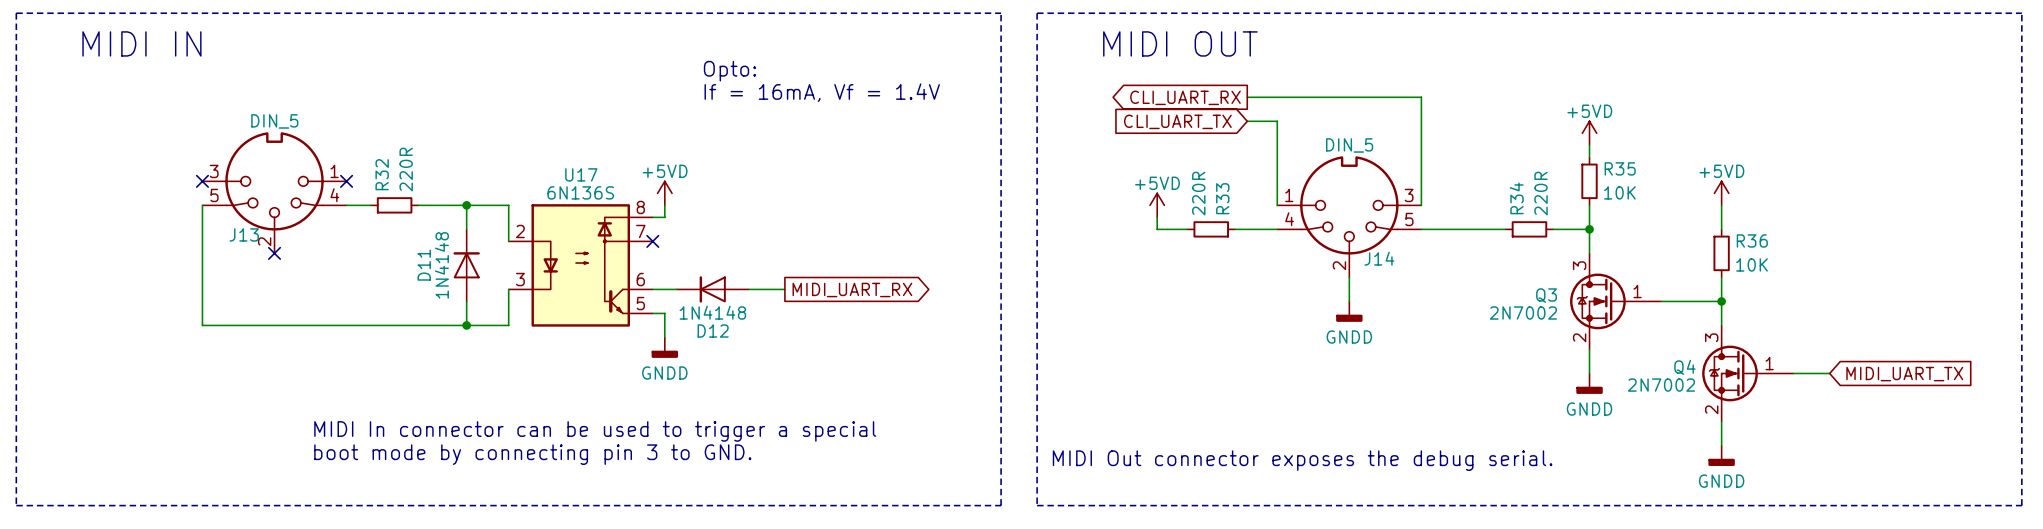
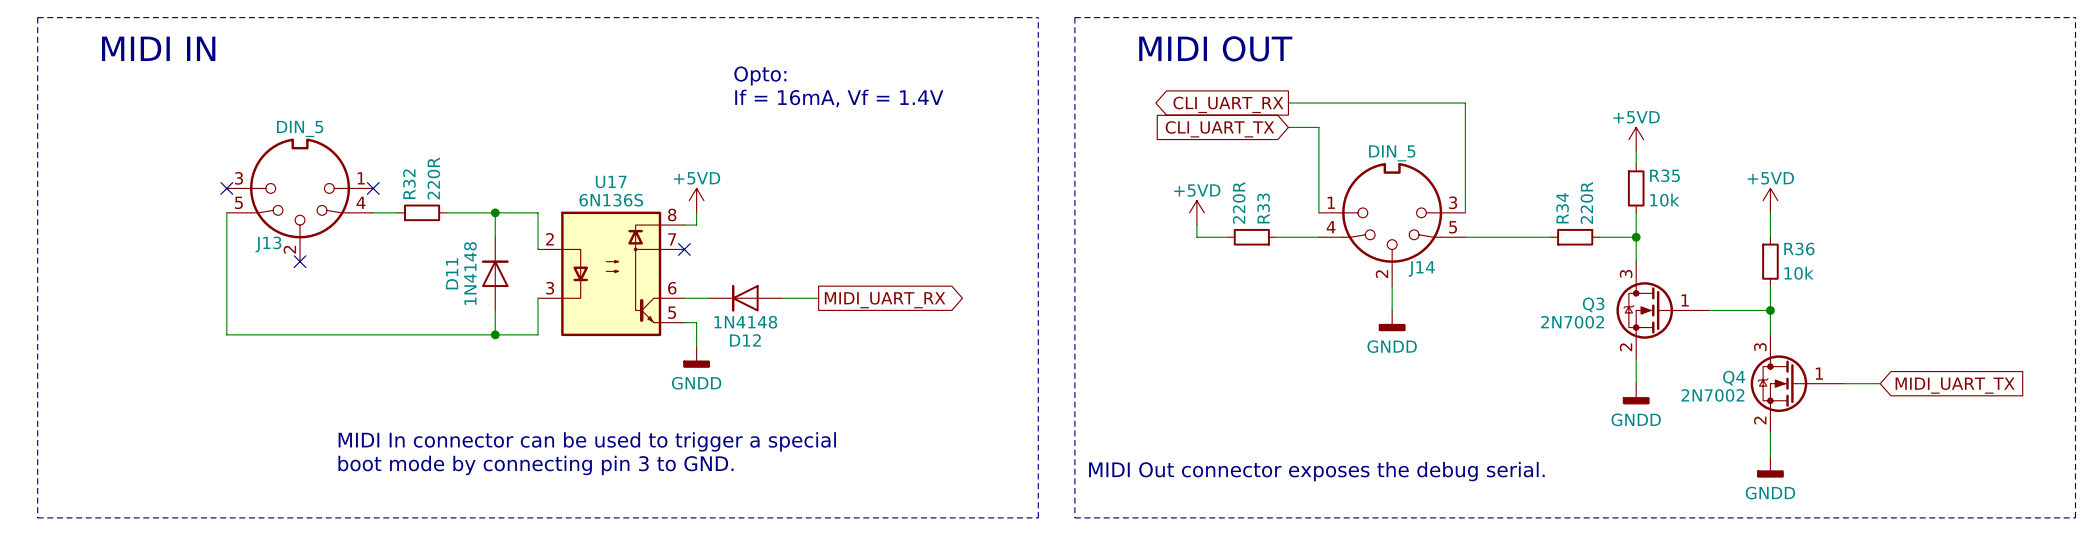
R35 value: 10K (1619, 192) -> 10k (1664, 200)
R36 value: 10K (1752, 264) -> 10k (1799, 273)

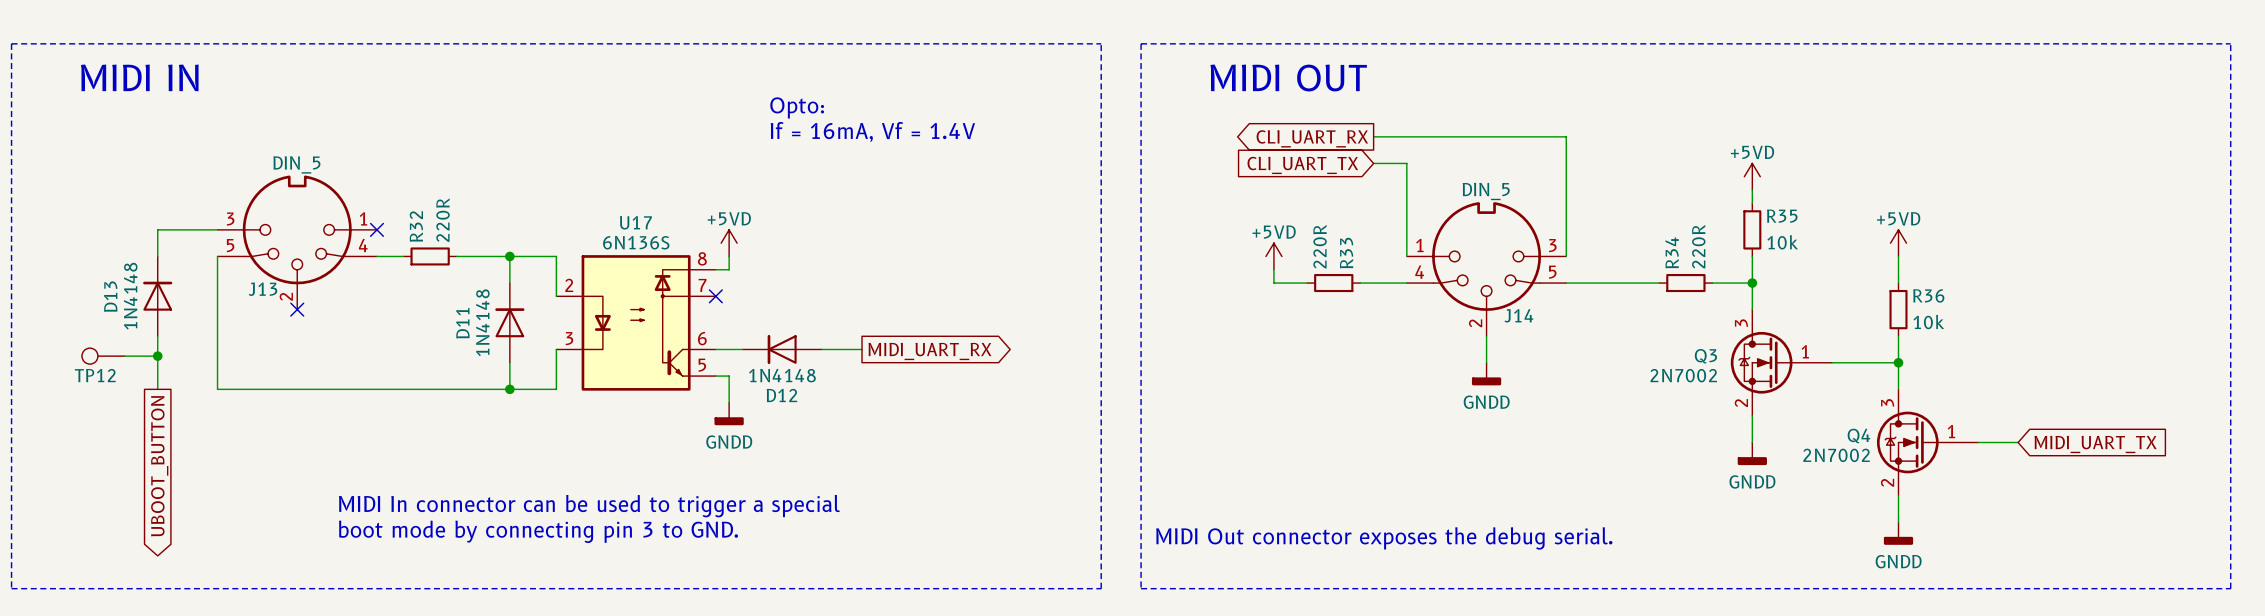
wire: none -> (217, 229) (157, 229) (157, 256)
no-connect mark: (226, 188) -> none
D13: none -> 1N4148 (157, 296)
wire: none -> (157, 336) (157, 389)
TP12: none -> (103, 356)
wire: none -> (124, 356) (157, 356)
junction: none -> (157, 356)
global label: none -> UBOOT_BUTTON (159, 466)

